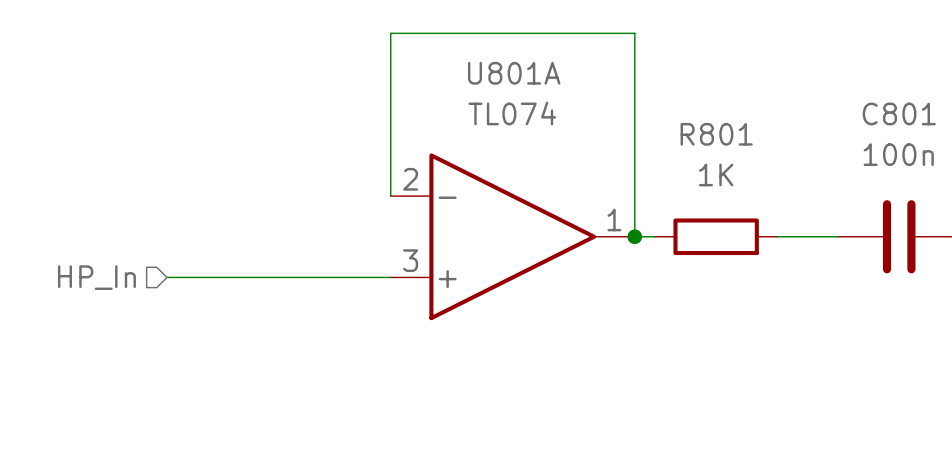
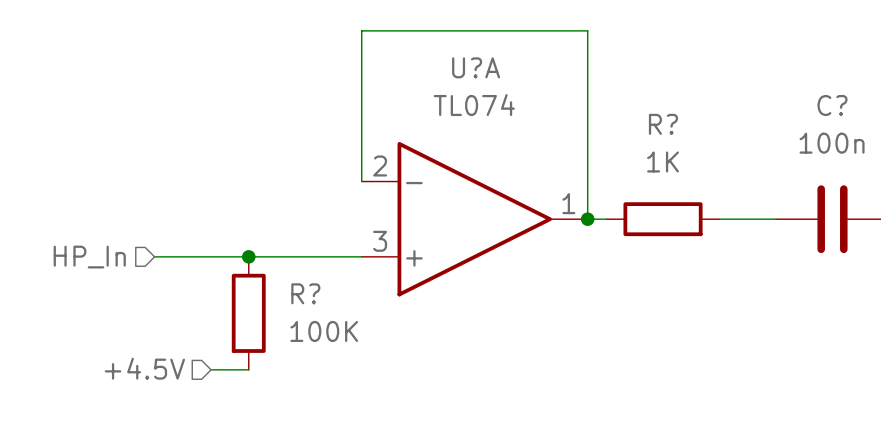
U801A name: U801A (514, 73) -> U?A (476, 67)
C801 name: C801 (899, 113) -> C? (832, 105)
R801 name: R801 (716, 134) -> R? (663, 124)
junction: none -> (248, 256)
R?: none -> 100K (248, 313)
hierarchical label: none -> +4.5V (144, 368)
wire: none -> (211, 369) (248, 369)

